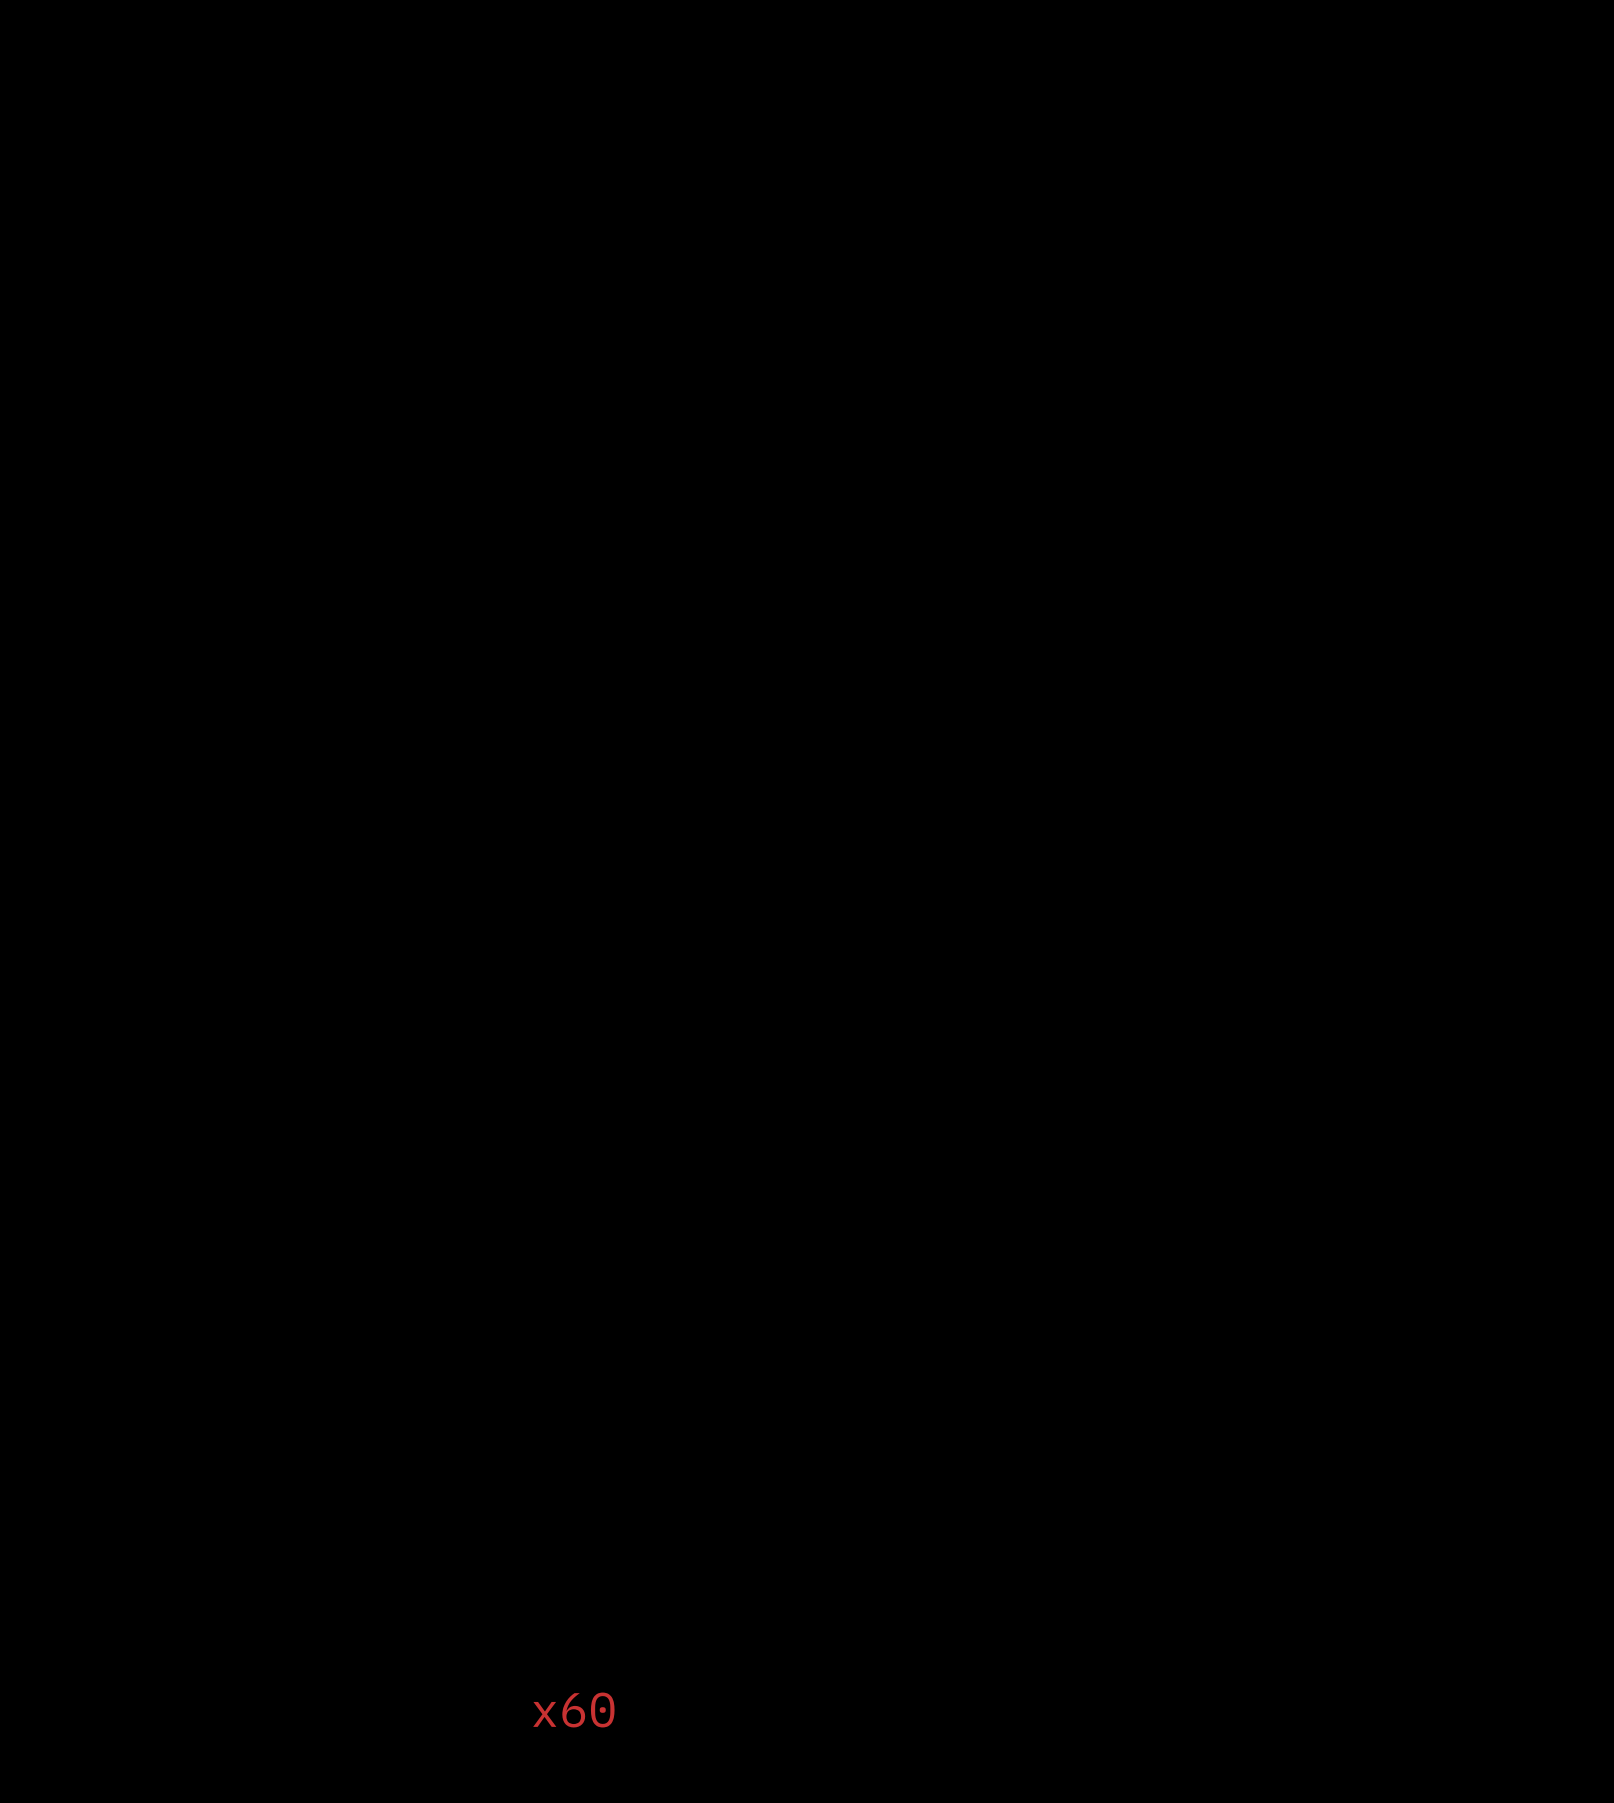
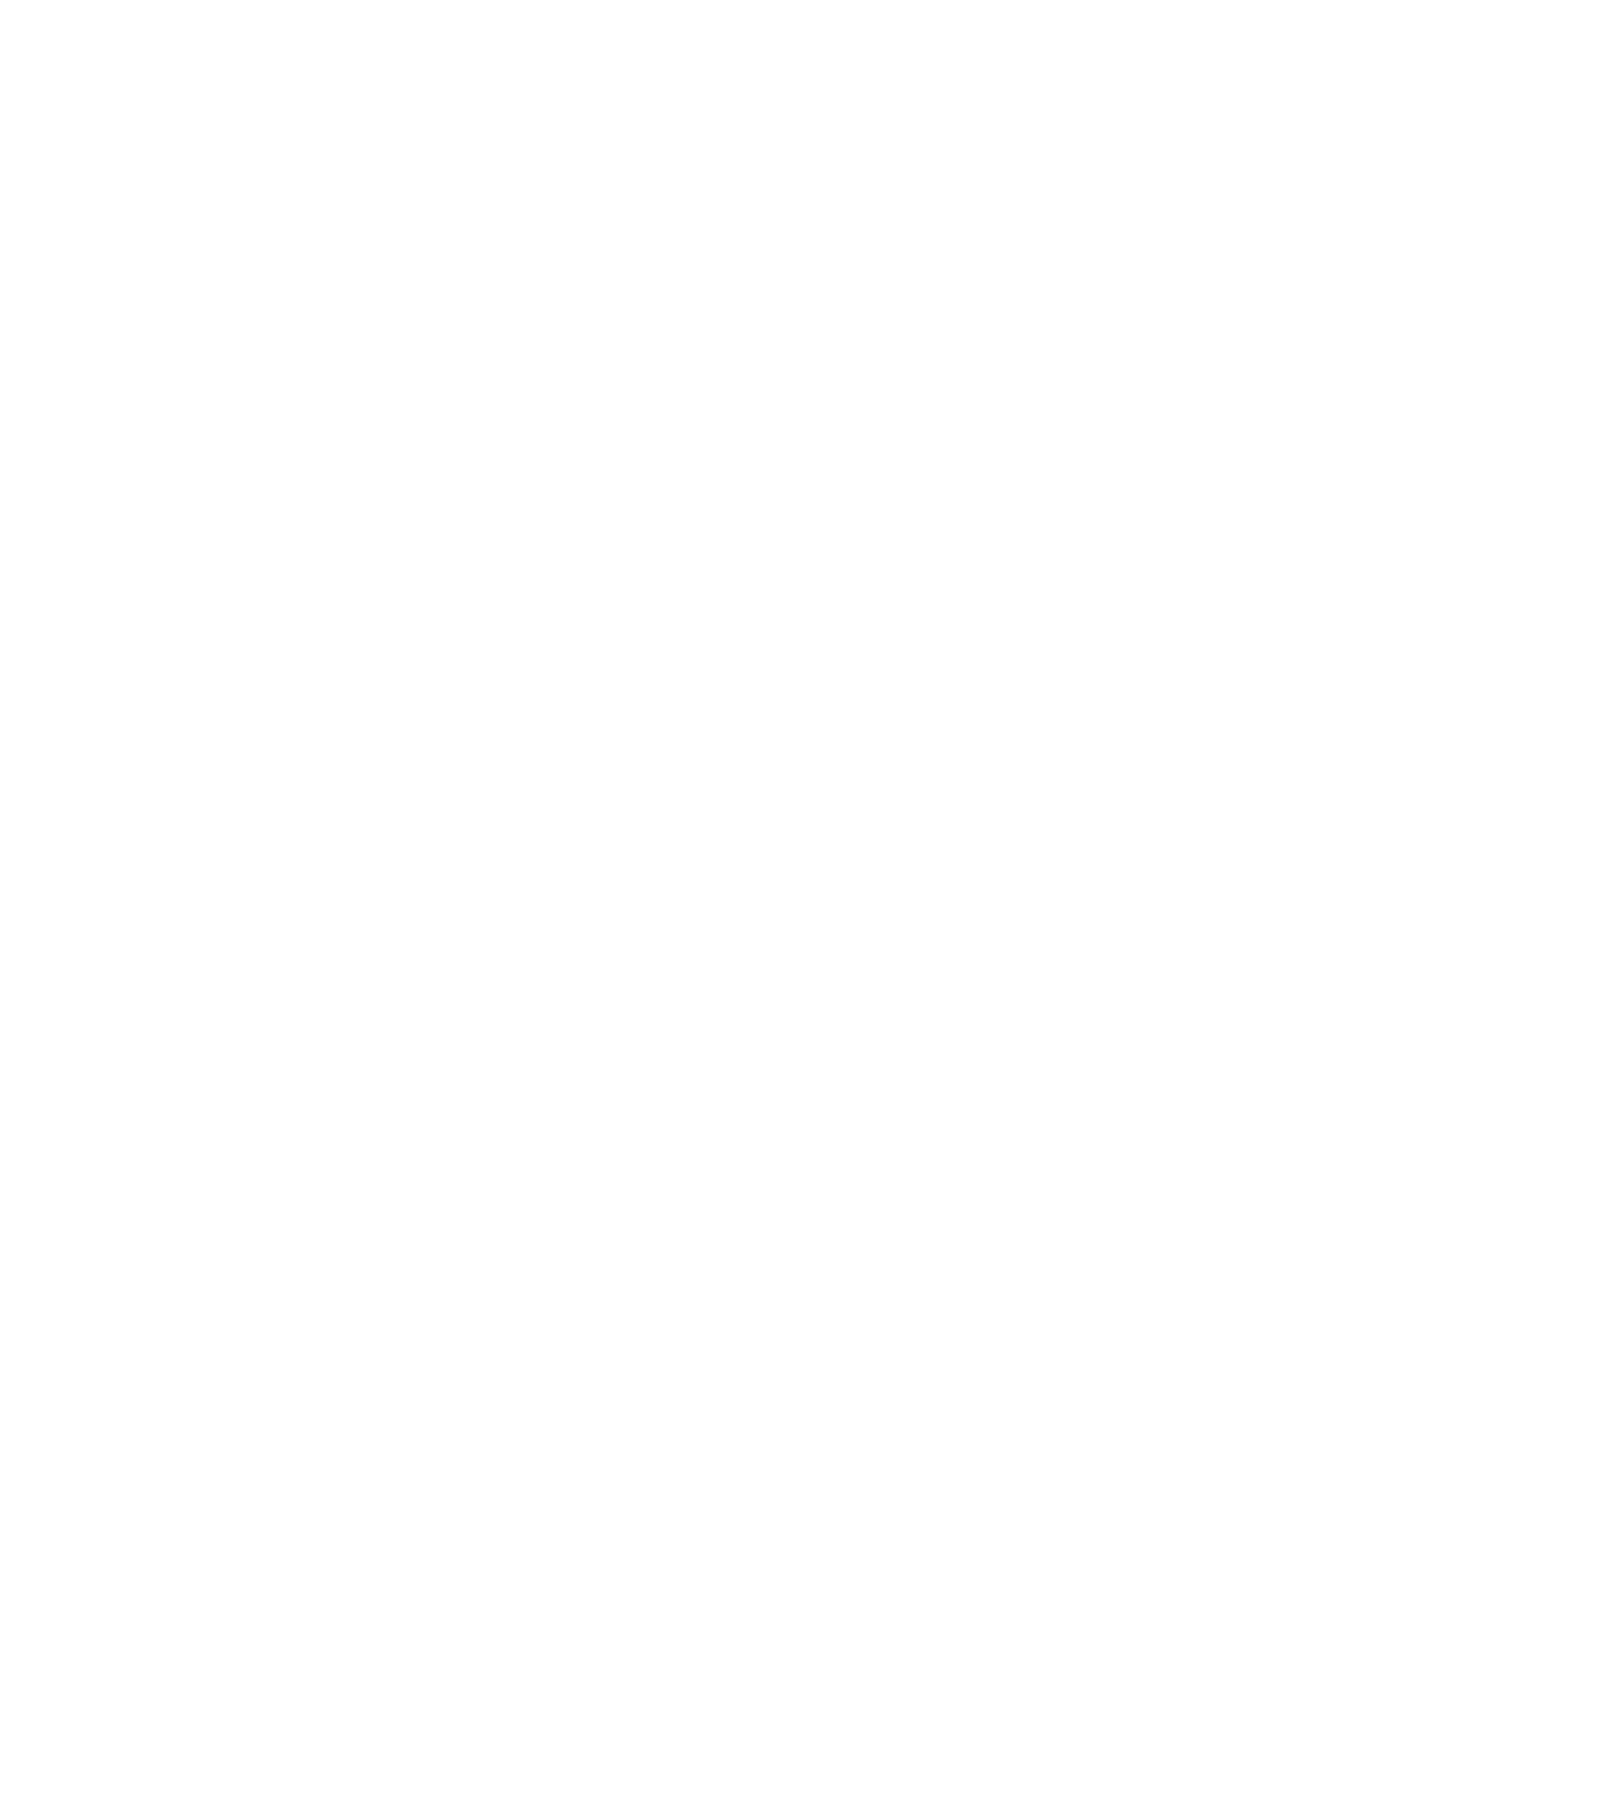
text: x60 (573, 1710) -> none

